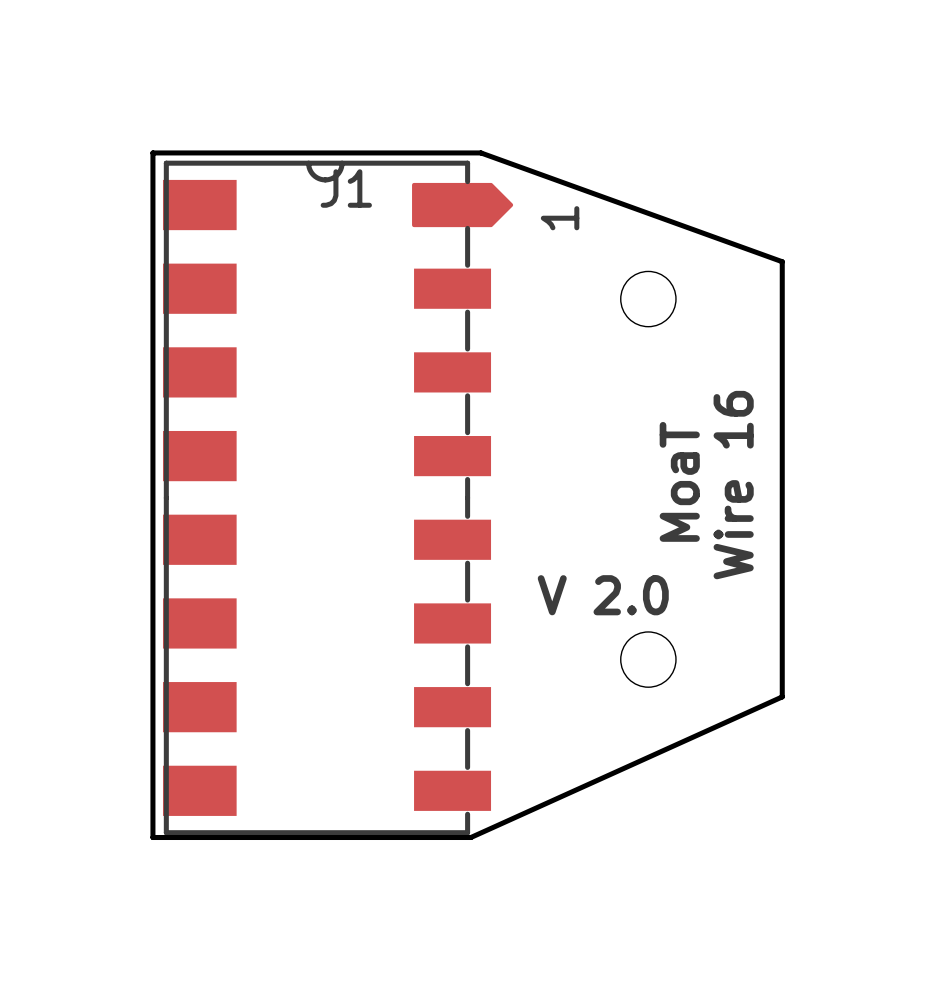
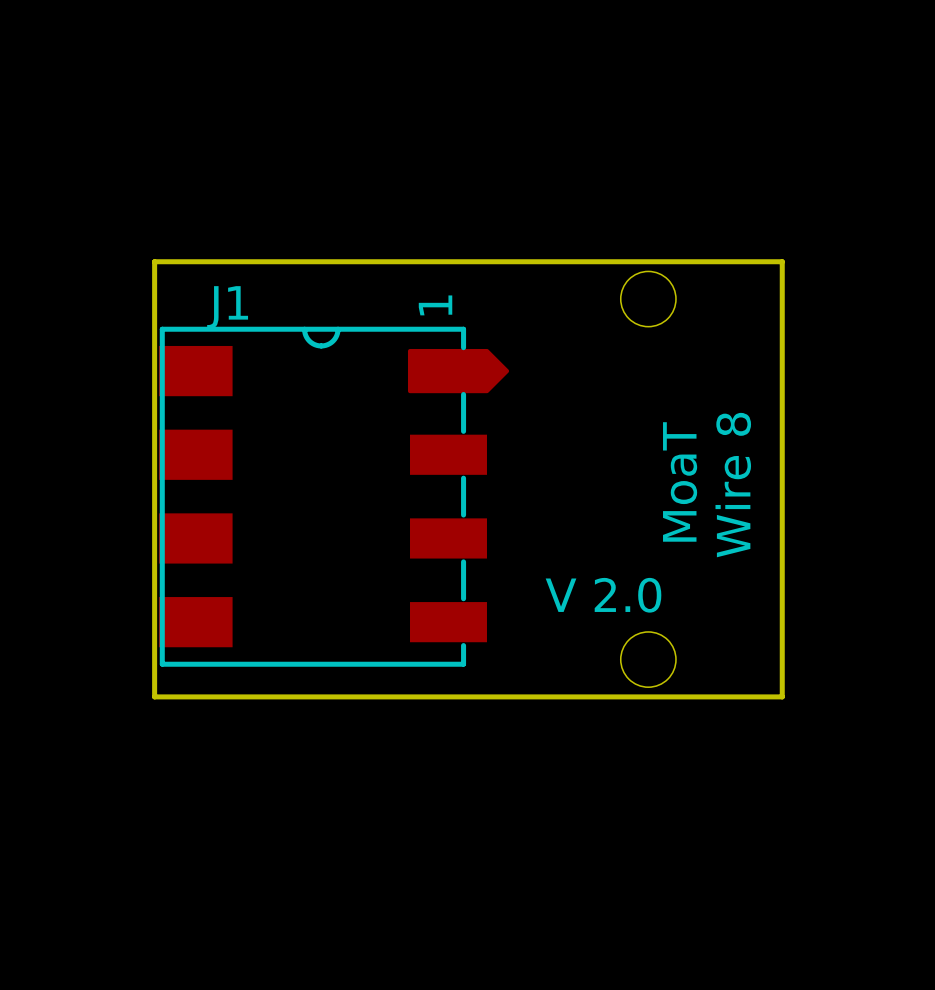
J1 footprint: [162, 160, 514, 836] -> [158, 326, 510, 667]
J1 name position: J1 (346, 188) -> J1 (227, 307)
board edge: (782, 261) (480, 152) (152, 152) (152, 837) (470, 837) (782, 696) -> (782, 261) (154, 261) (154, 696) (782, 696)
text: Wire 16 (733, 485) -> Wire 8 (733, 485)

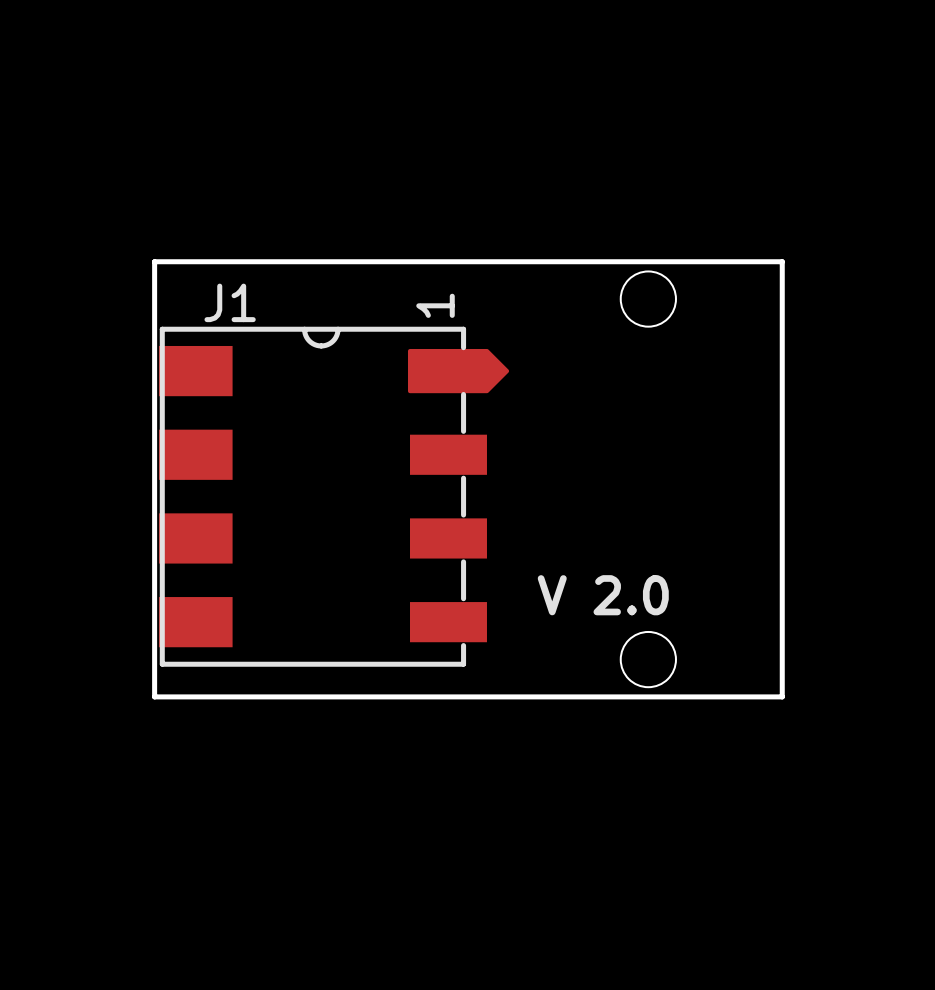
text: MoaT (680, 481) -> none
text: Wire 8 (733, 485) -> none

